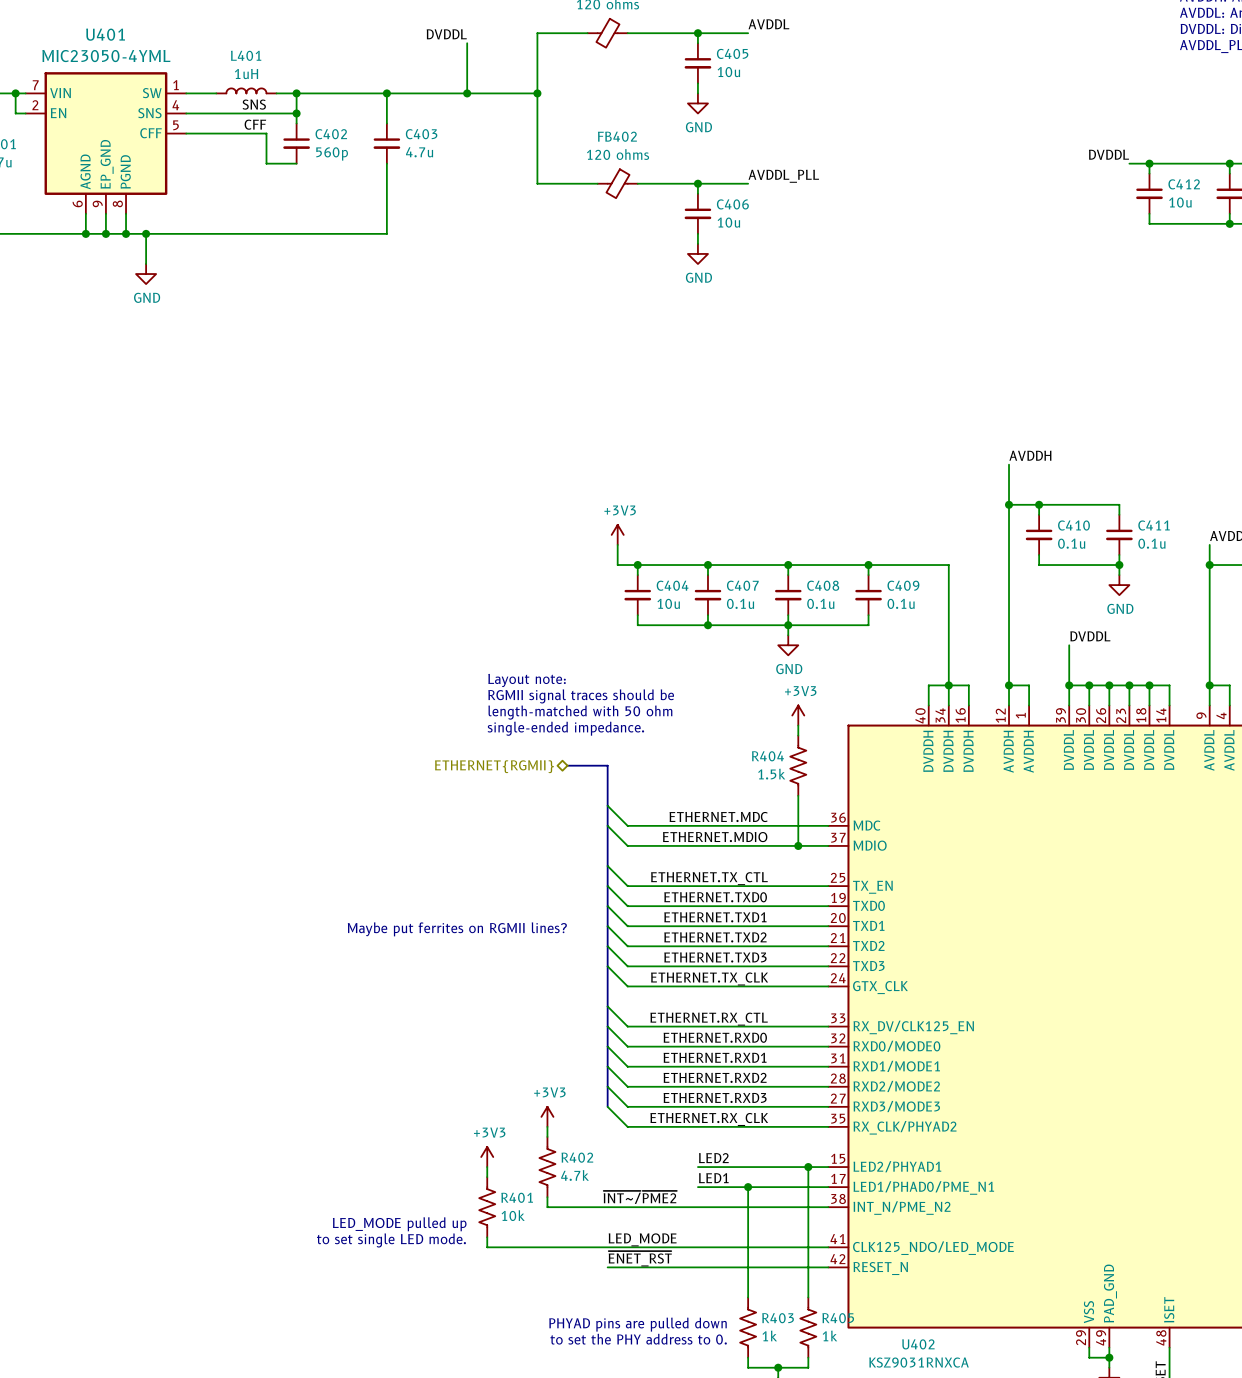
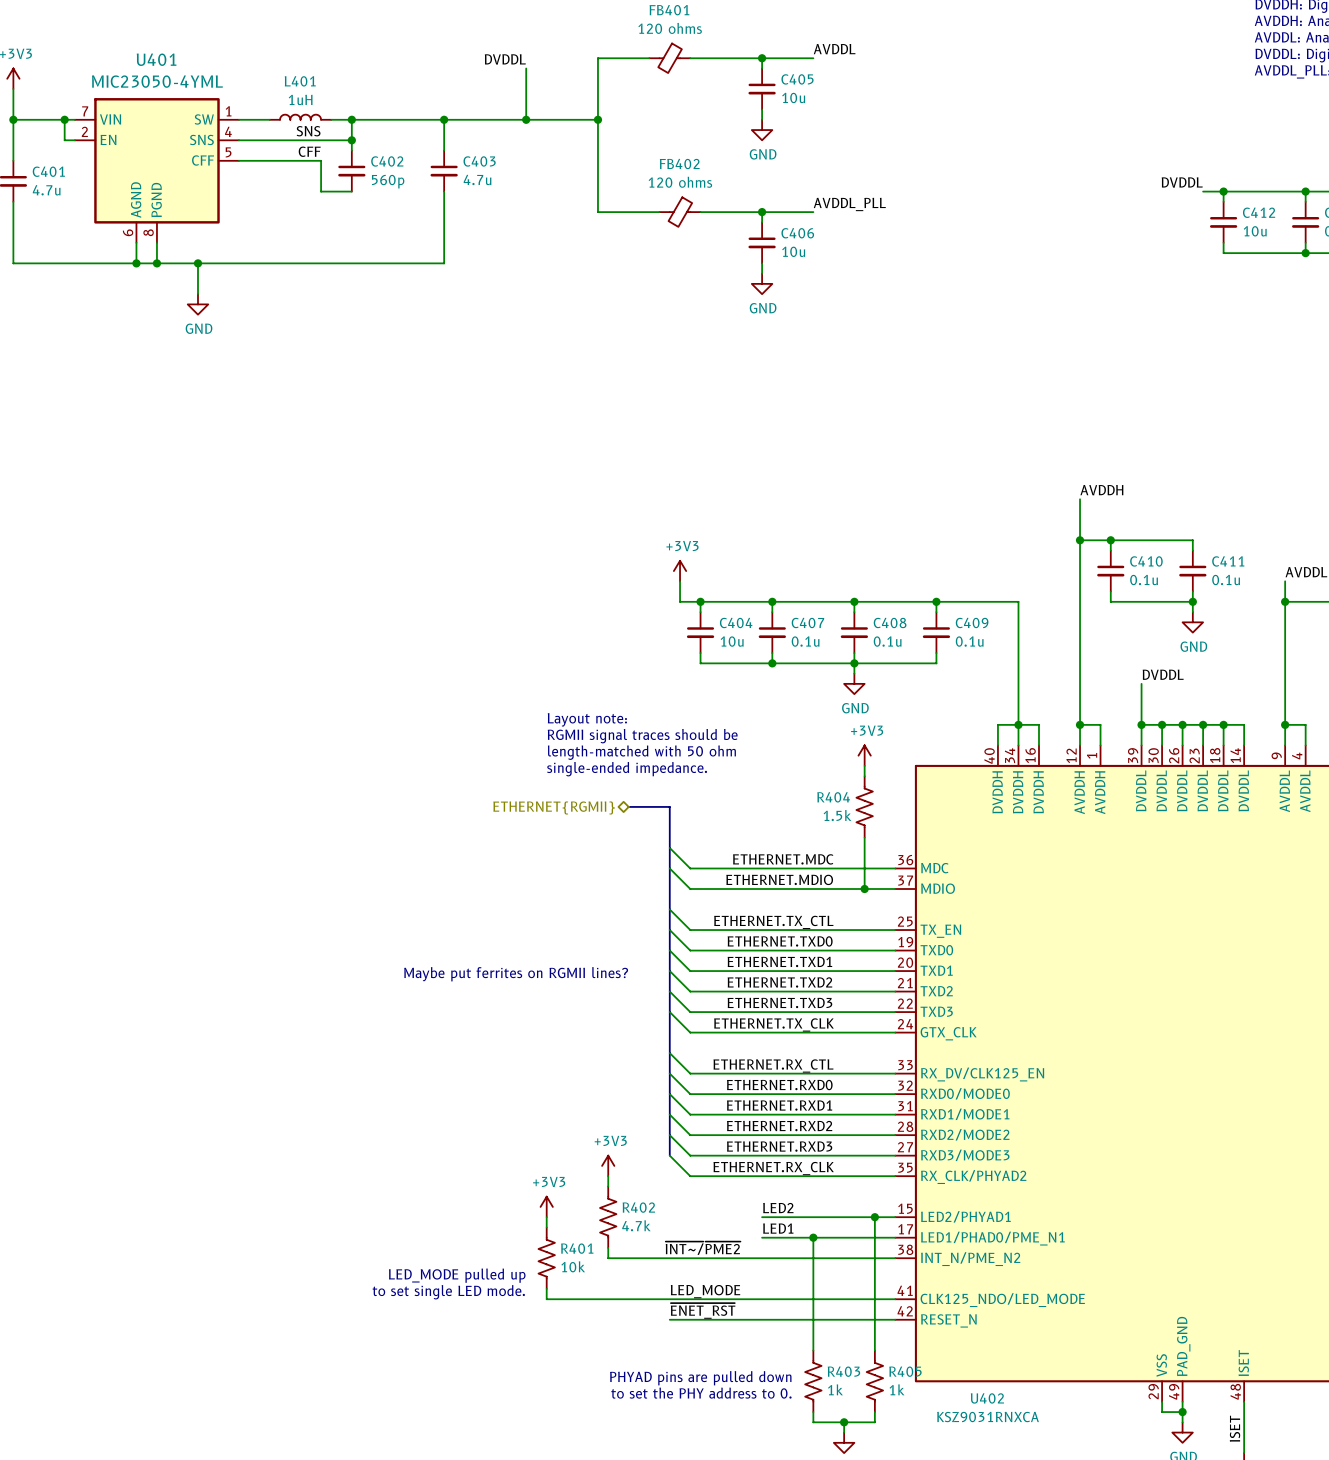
U401 symbol: [25, 72, 187, 214] -> [74, 98, 240, 243]
wire: (126, 213) (126, 233) -> none
junction: (126, 233) -> none

